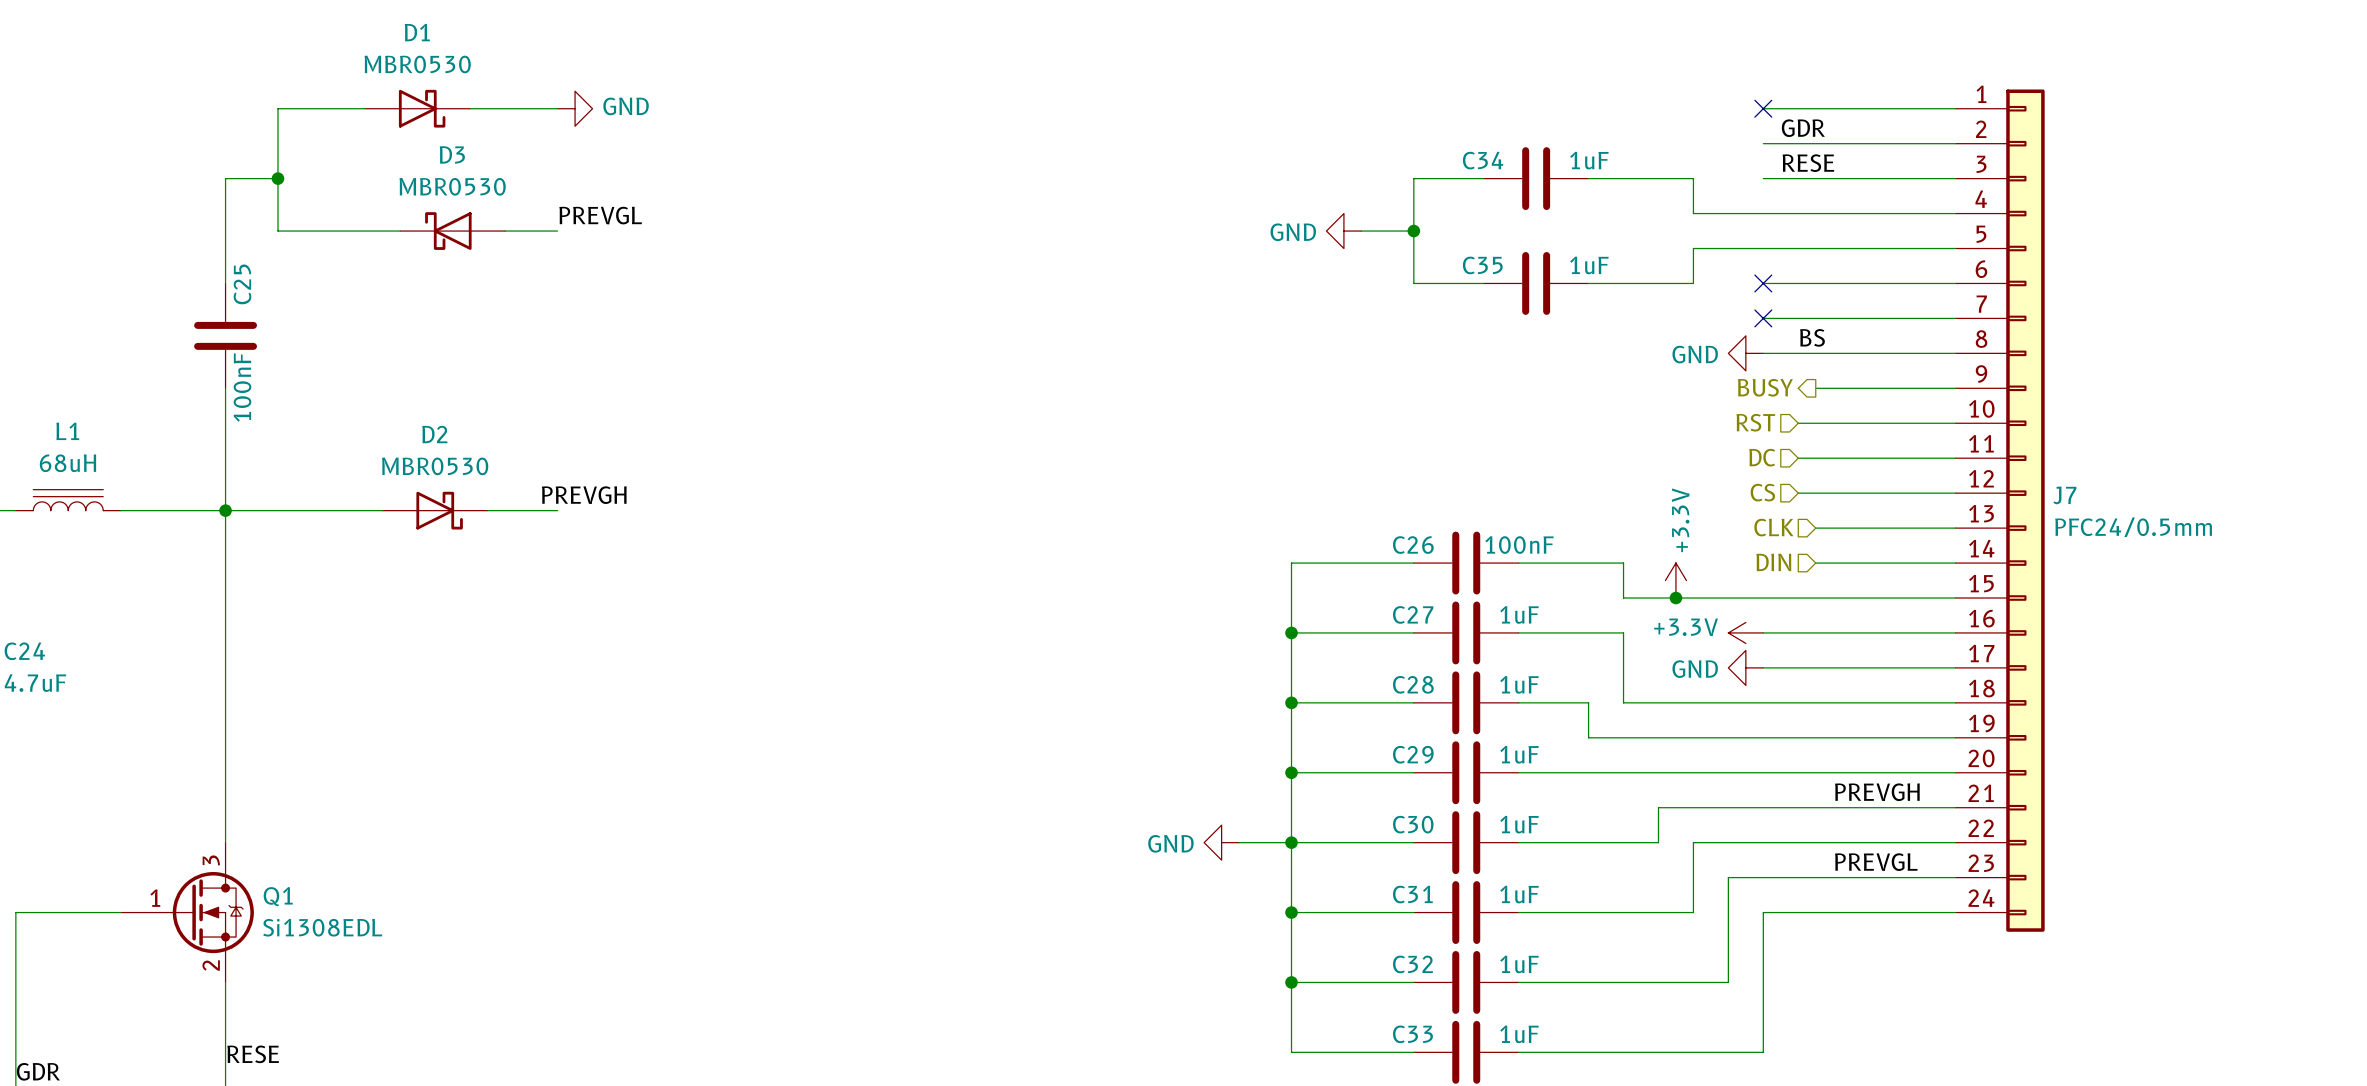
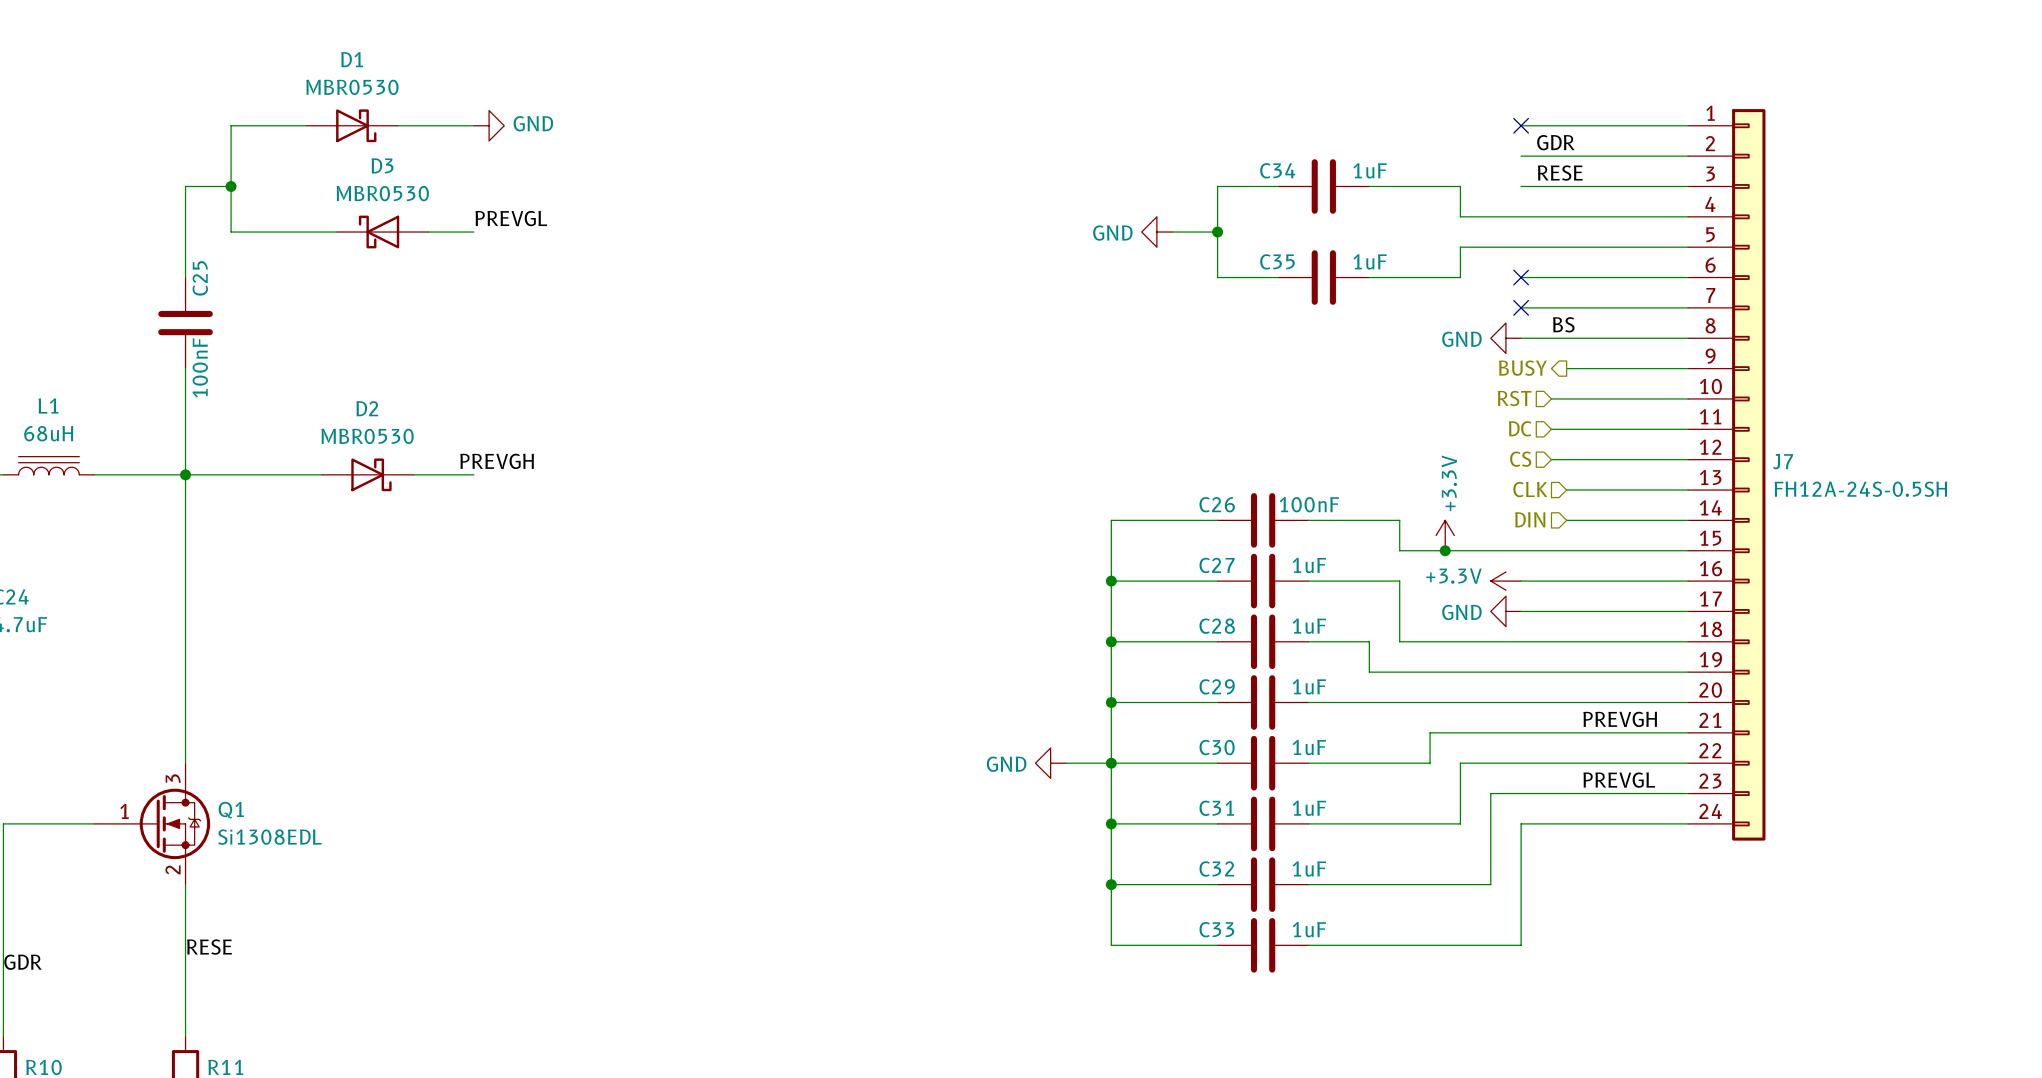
J7 value: PFC24/0.5mm (2133, 527) -> FH12A-24S-0.5SH (1860, 489)

